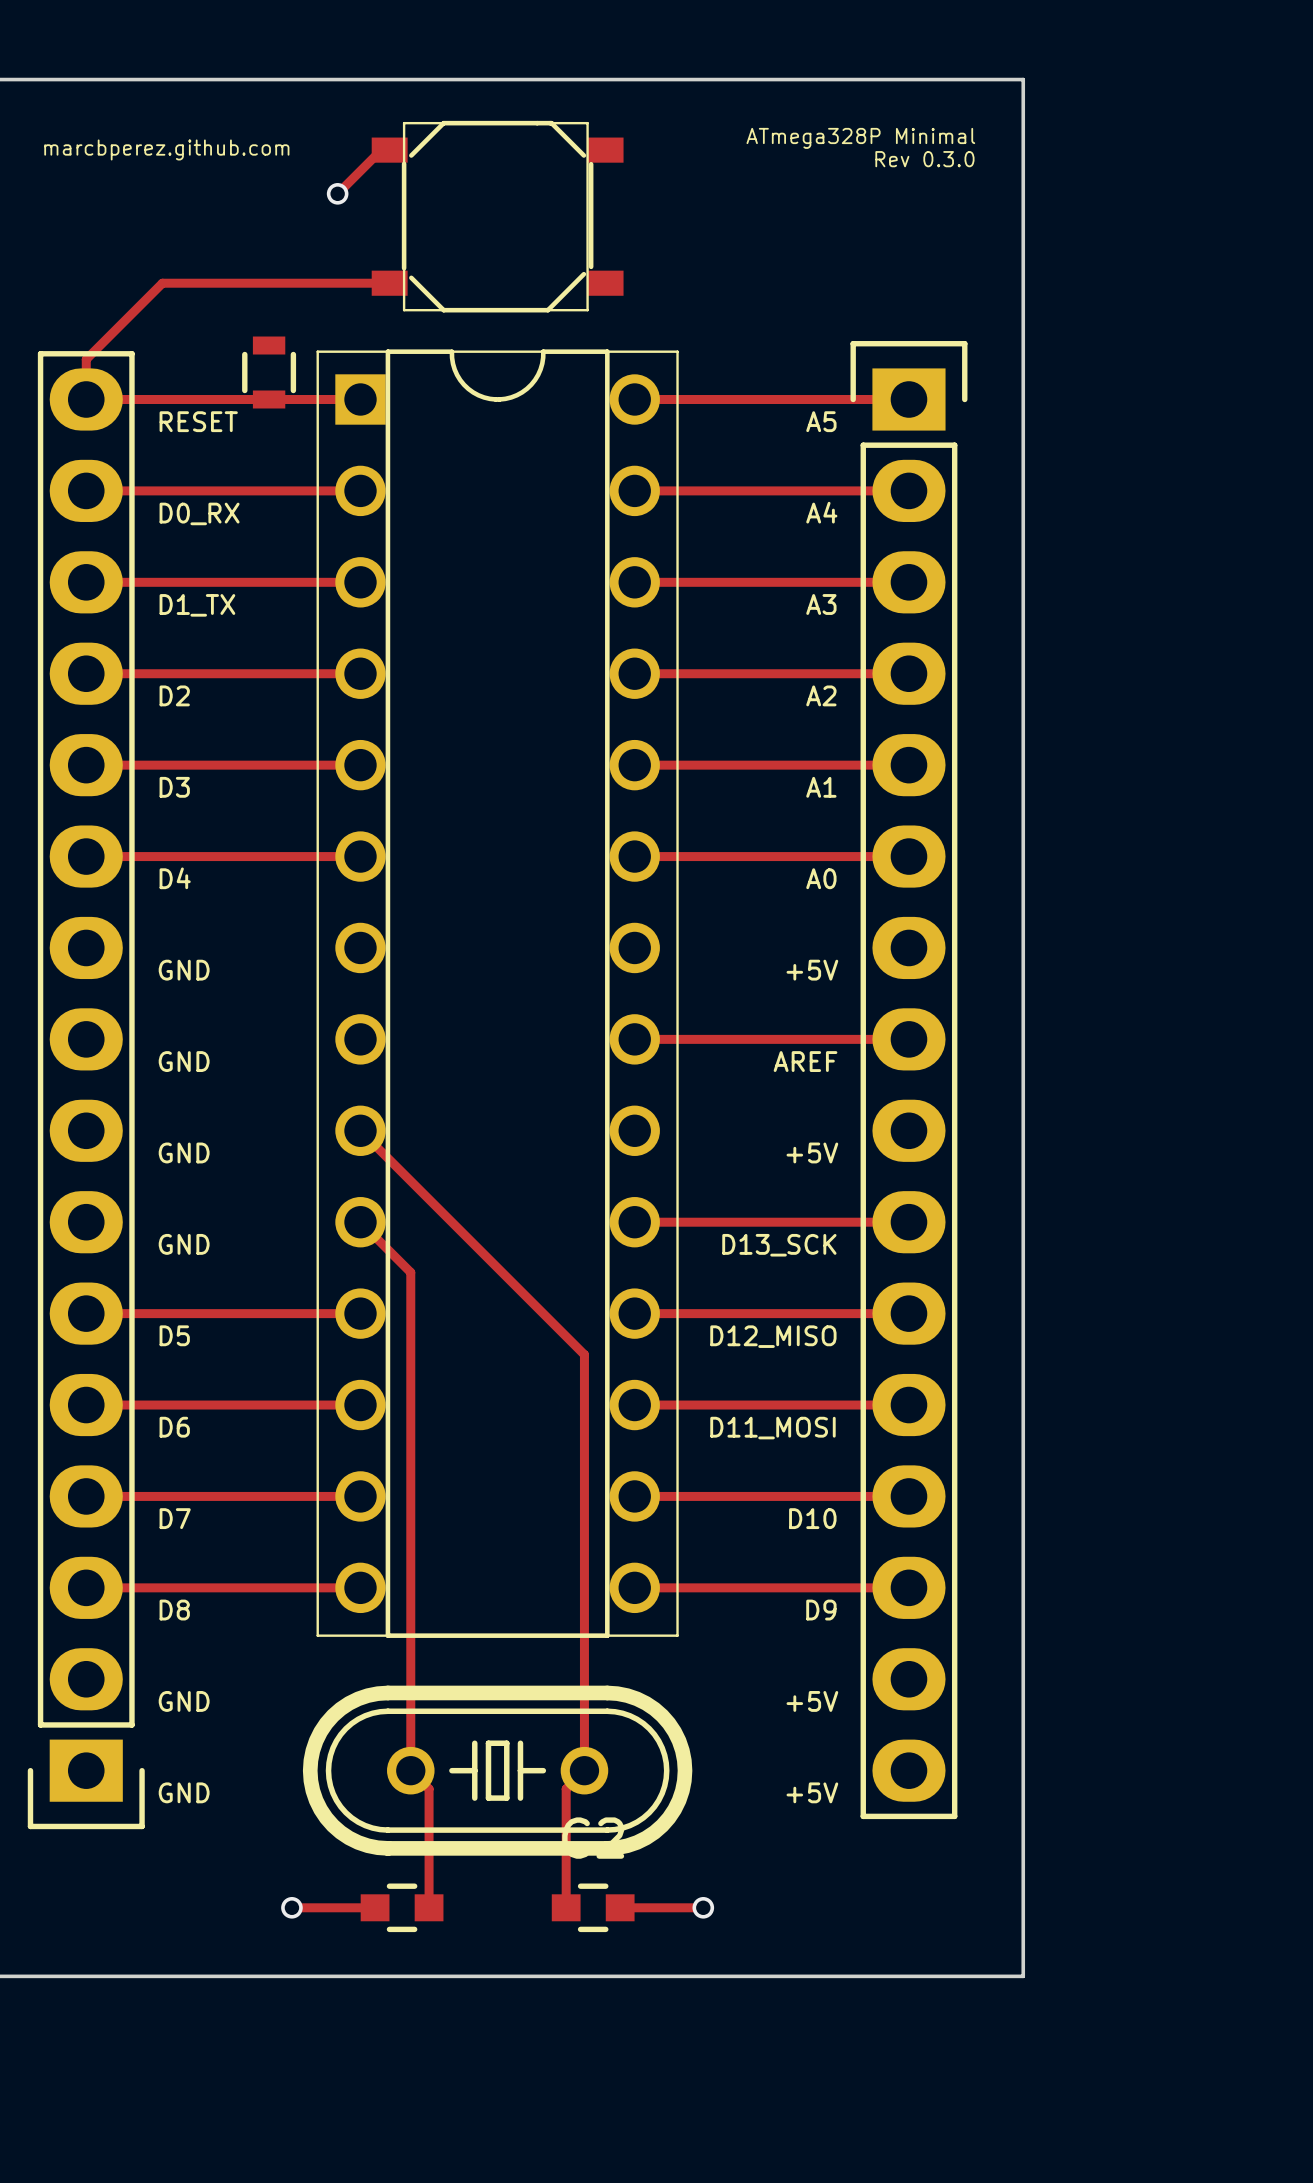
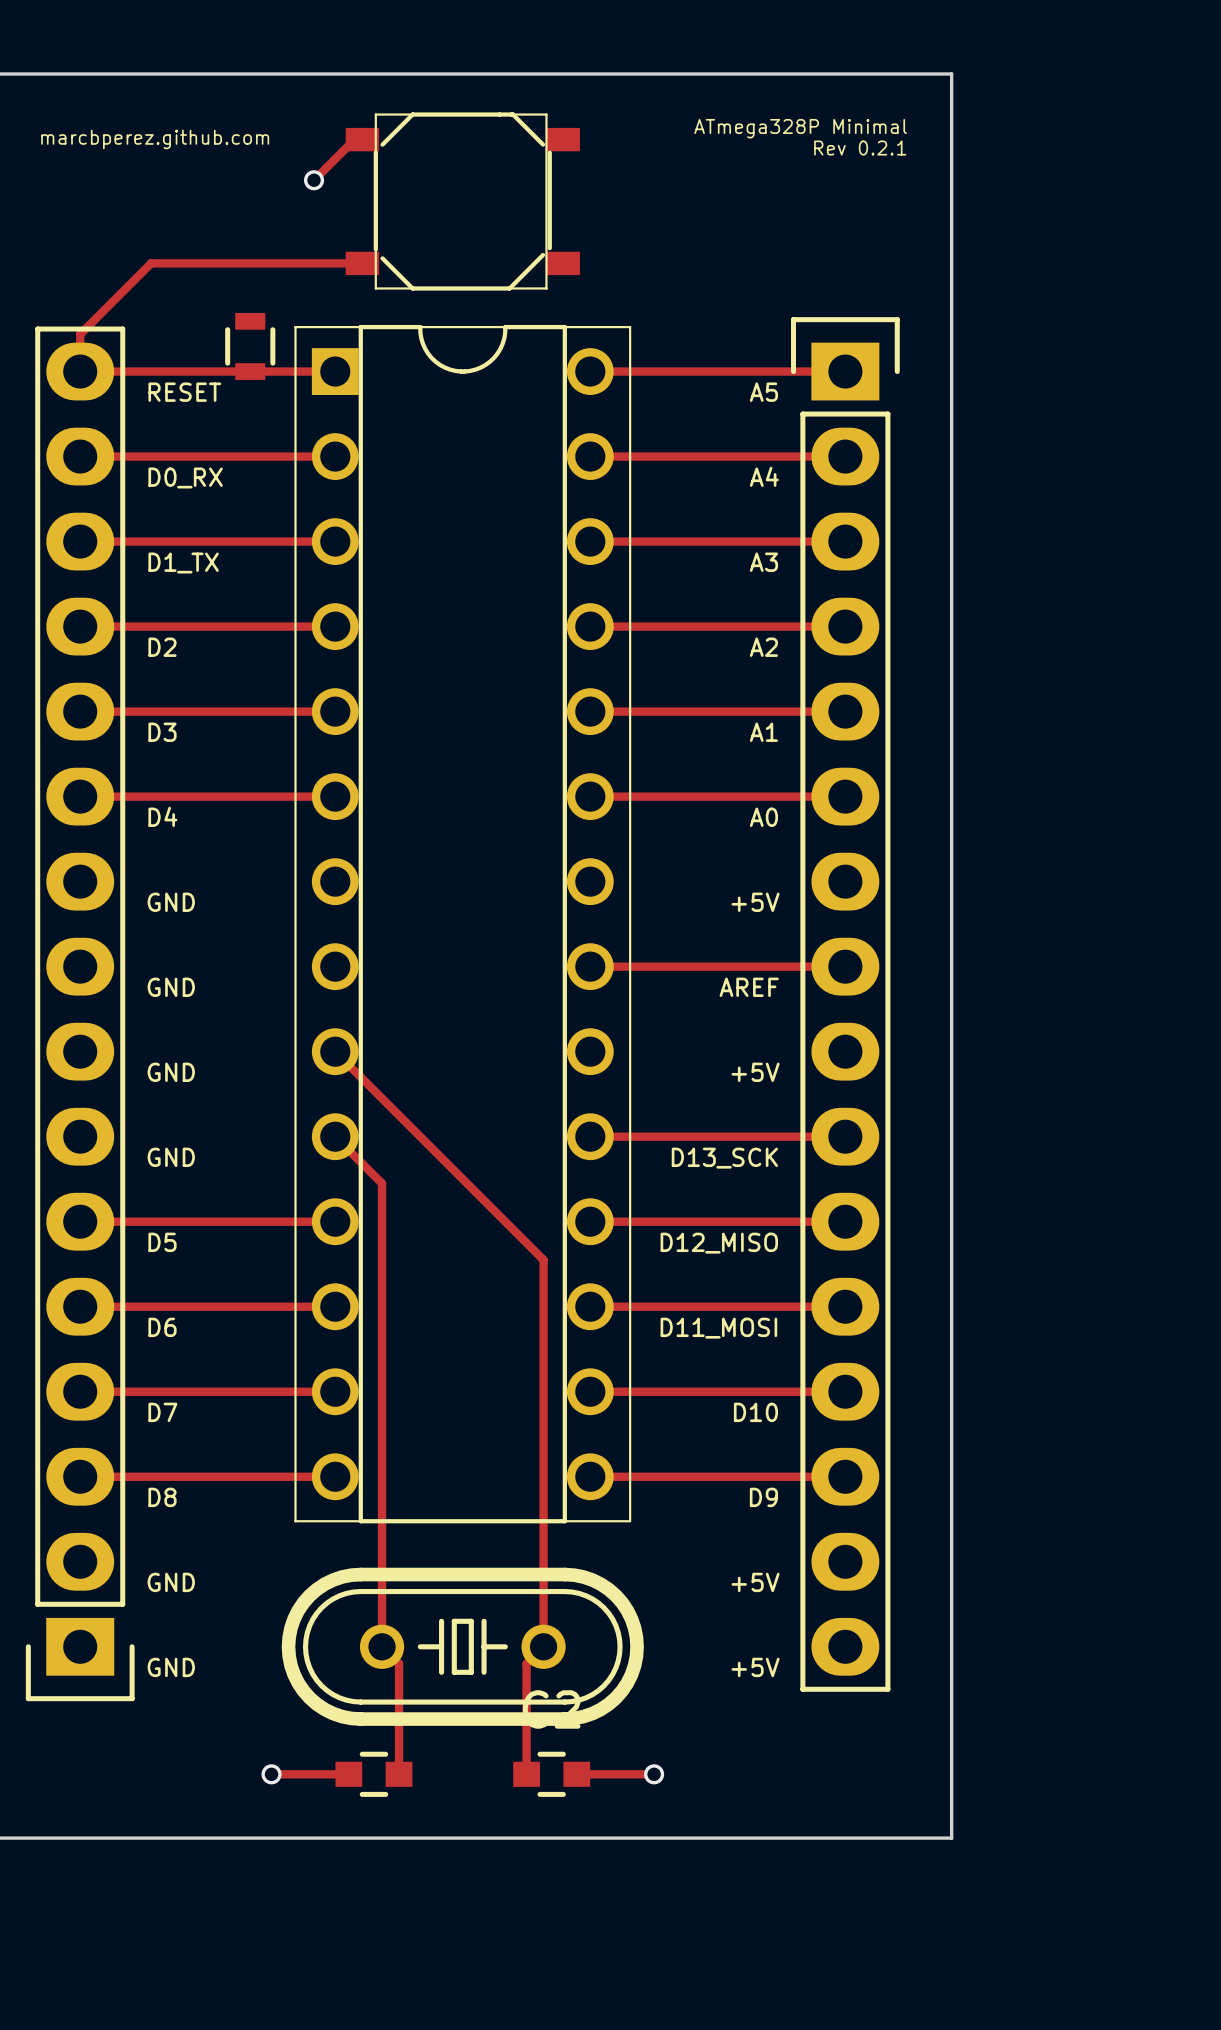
text: Rev 0.3.0 (924, 159) -> Rev 0.2.1 (860, 148)

